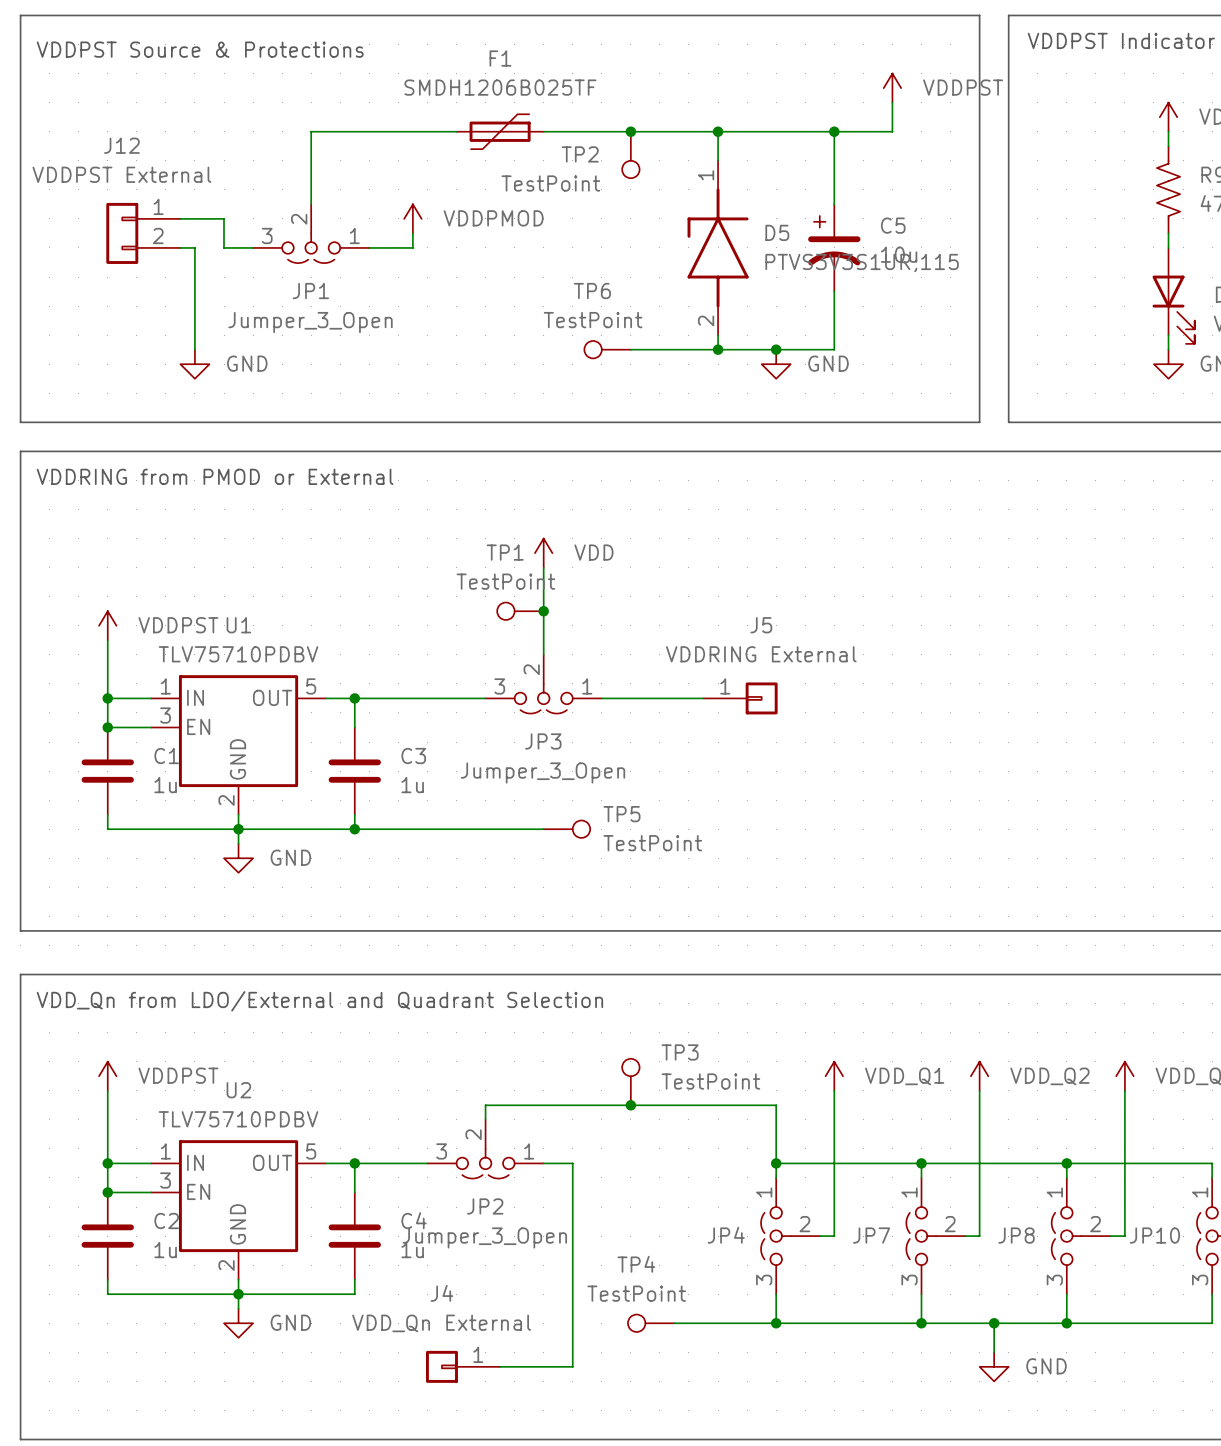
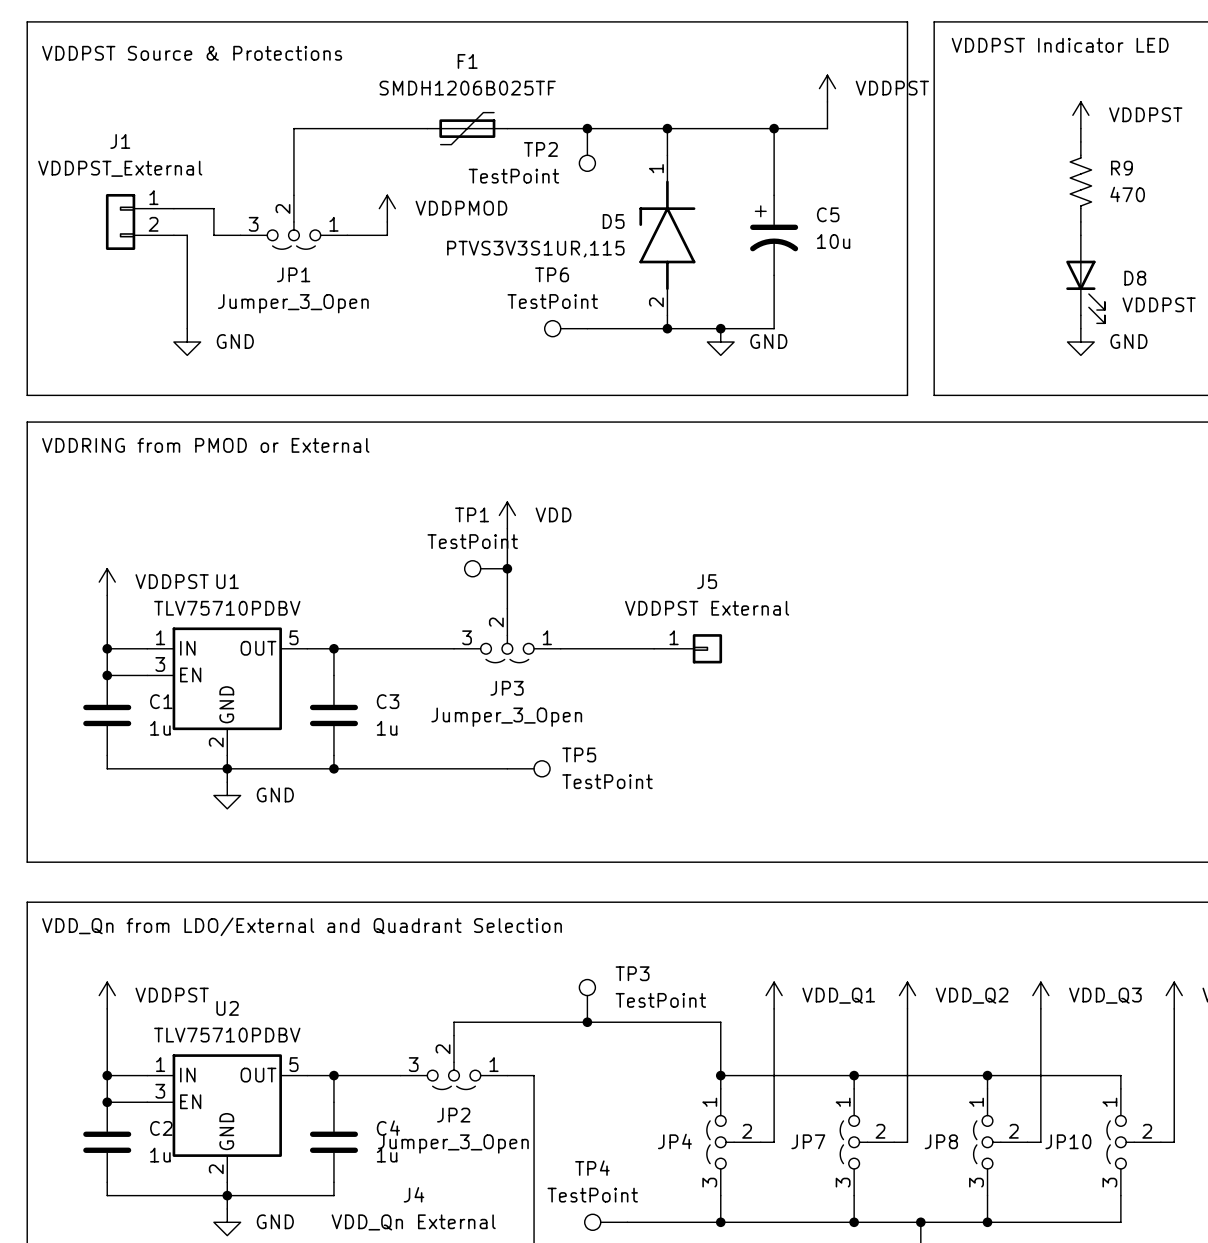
J12 name: J12 (121, 145) -> J1 (120, 141)
J12 value: VDDPST External (121, 174) -> VDDPST_External (120, 168)
D5 name position: D5 (777, 232) -> D5 (613, 221)
D5 value position: PTVS3V3S1UR,115 (862, 262) -> PTVS3V3S1UR,115 (535, 249)
J5 value: VDDRING External (761, 654) -> VDDPST External (707, 608)

